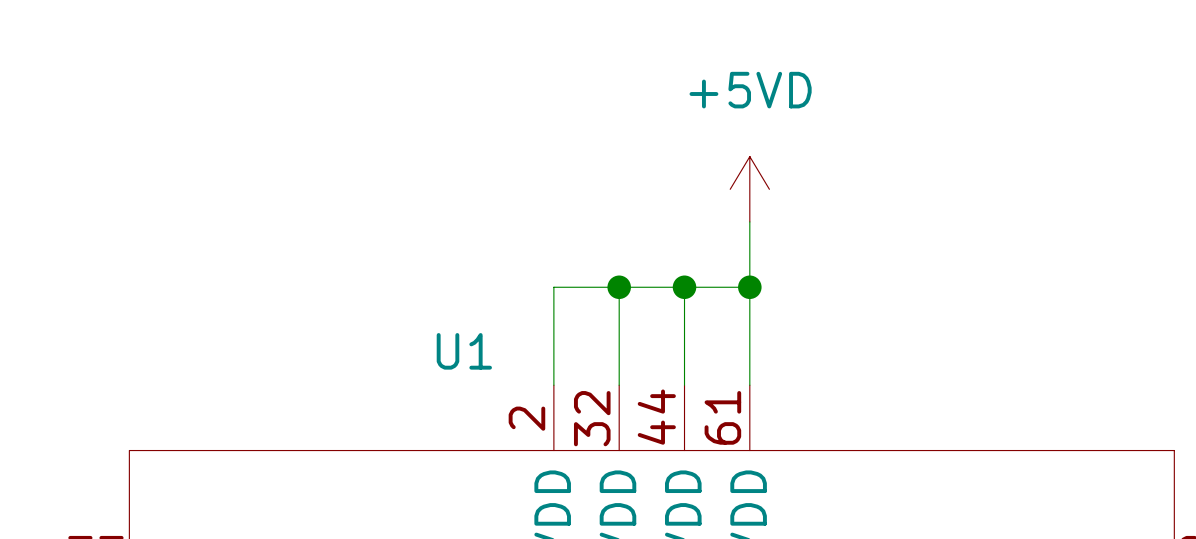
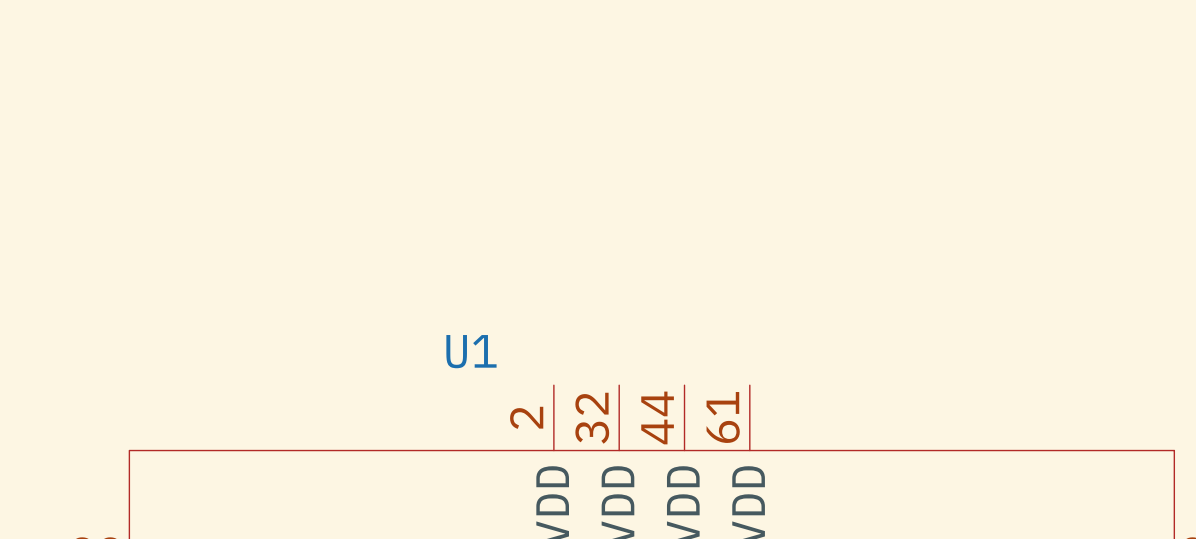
power symbol: +5VD (749, 189) -> none
wire: (749, 221) (749, 385) -> none
wire: (619, 287) (619, 385) -> none
junction: (619, 287) -> none
wire: (684, 287) (684, 385) -> none
junction: (684, 287) -> none
wire: (749, 287) (553, 287) (553, 385) -> none
junction: (749, 287) -> none

